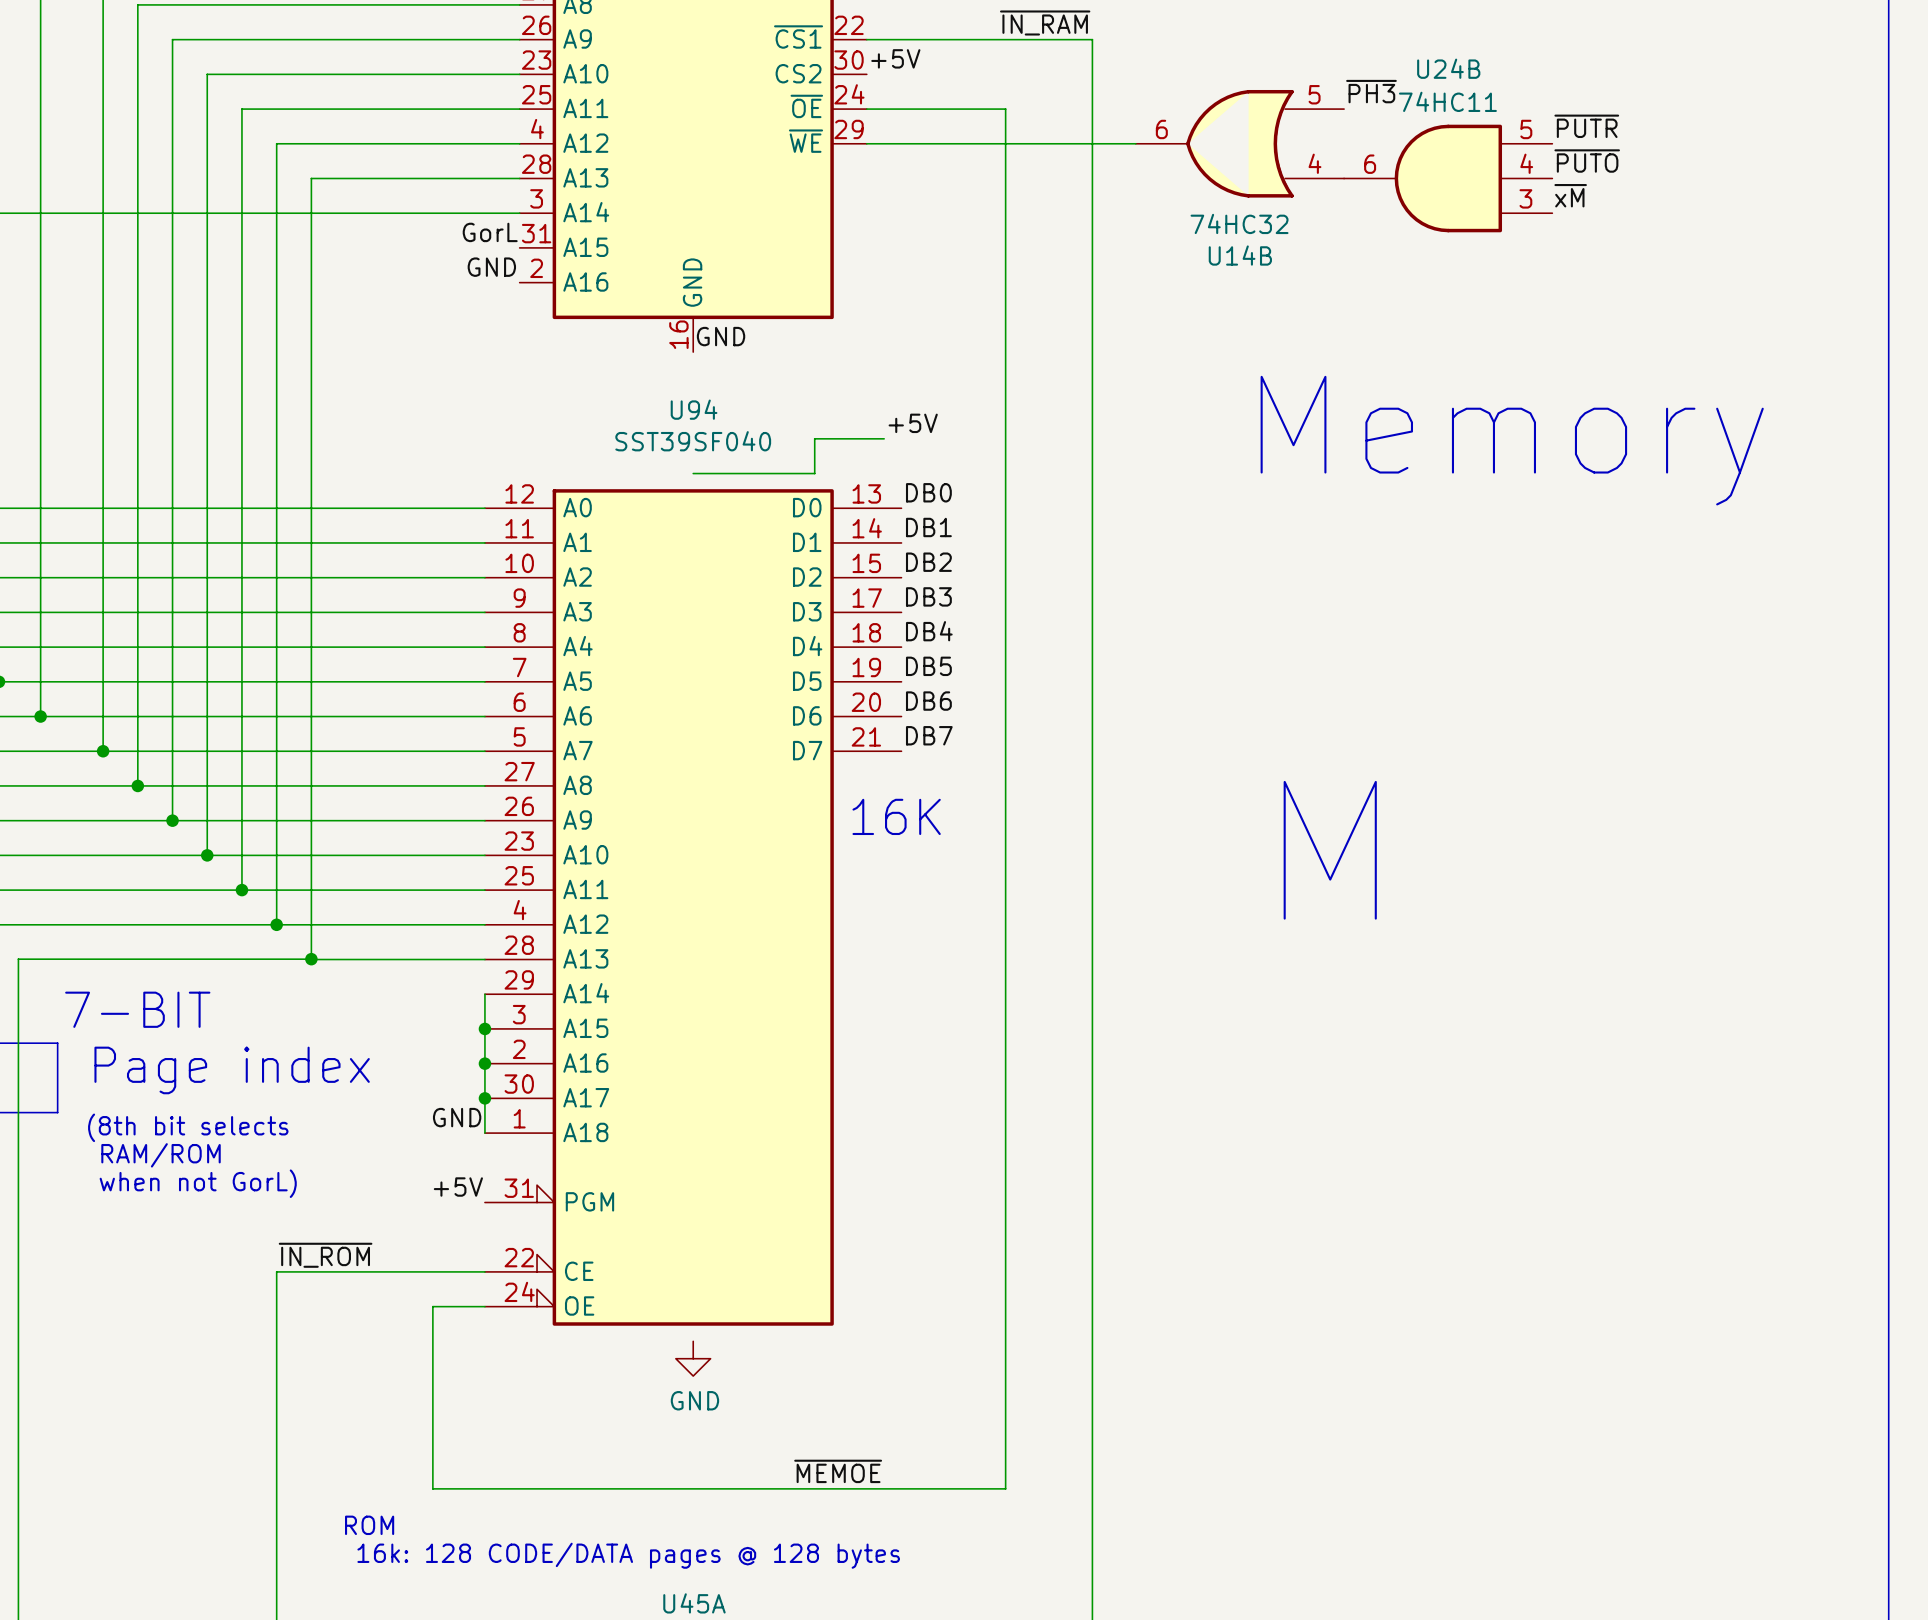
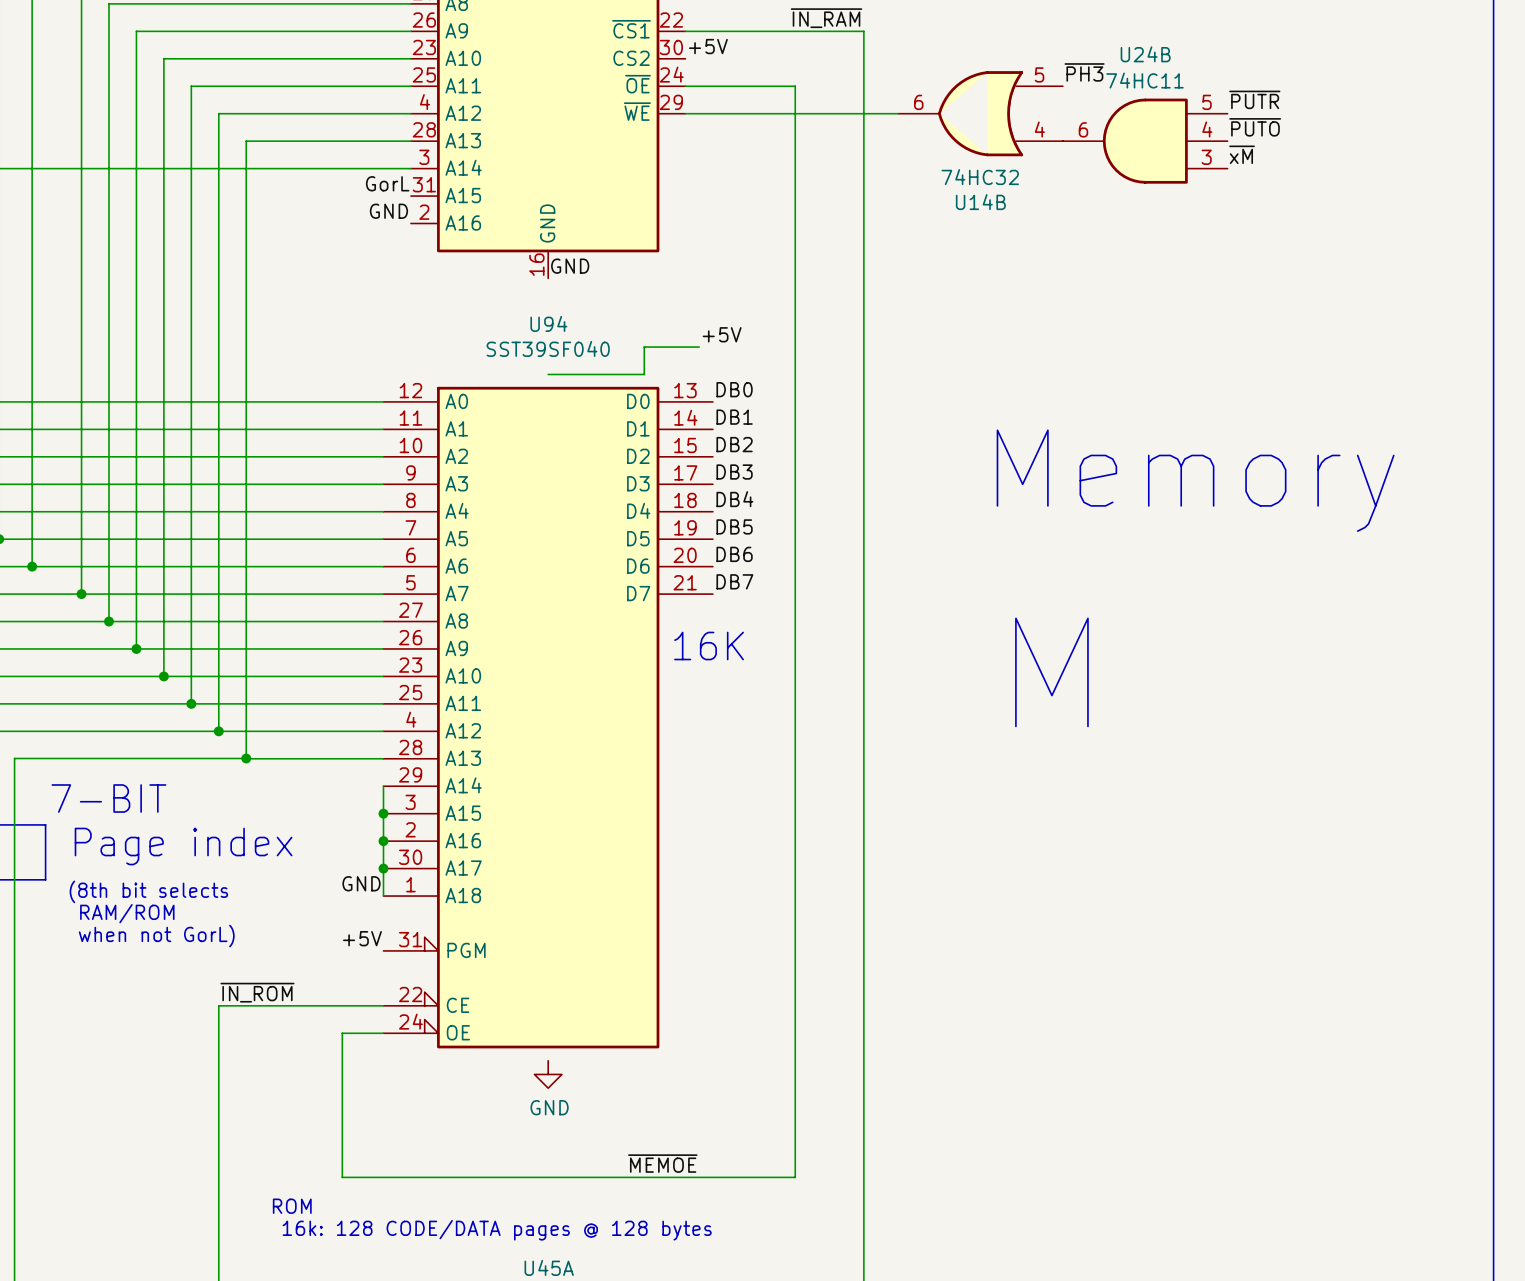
text position: Memory (1512, 440) -> Memory (1195, 480)

